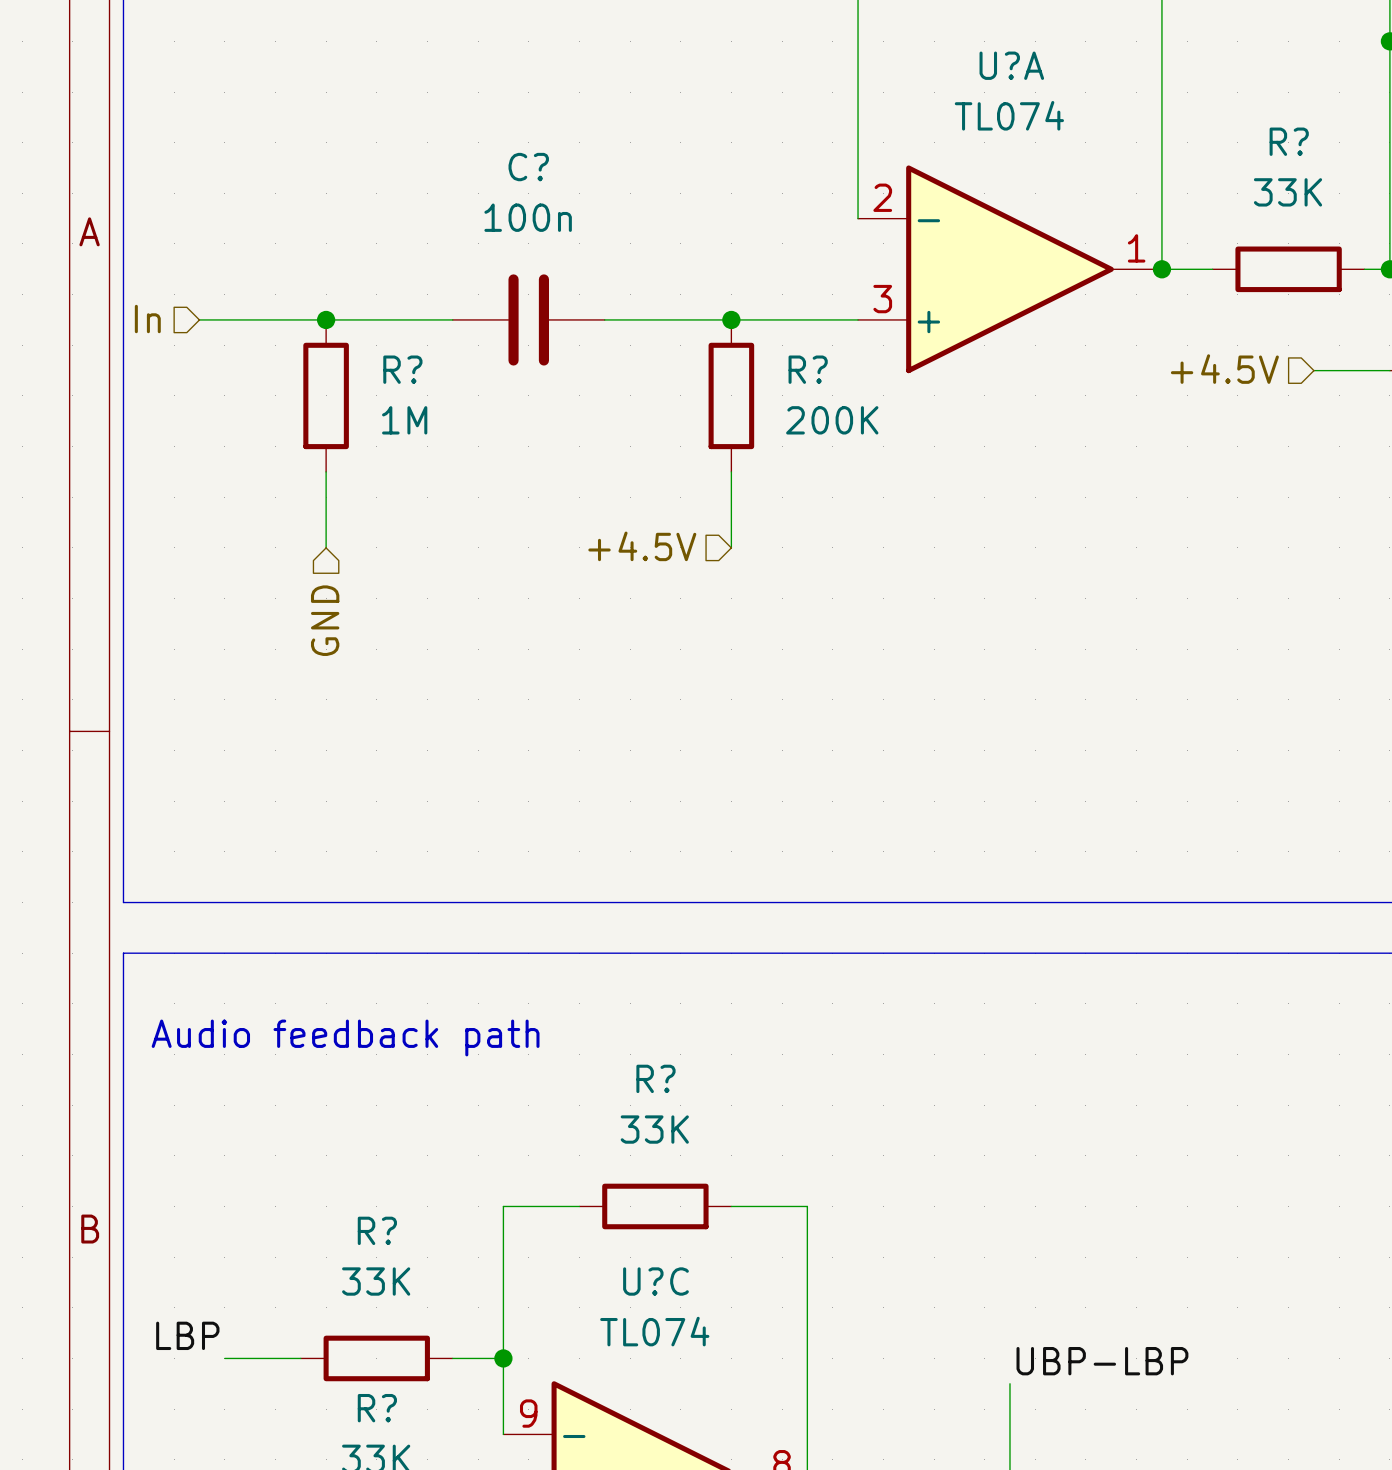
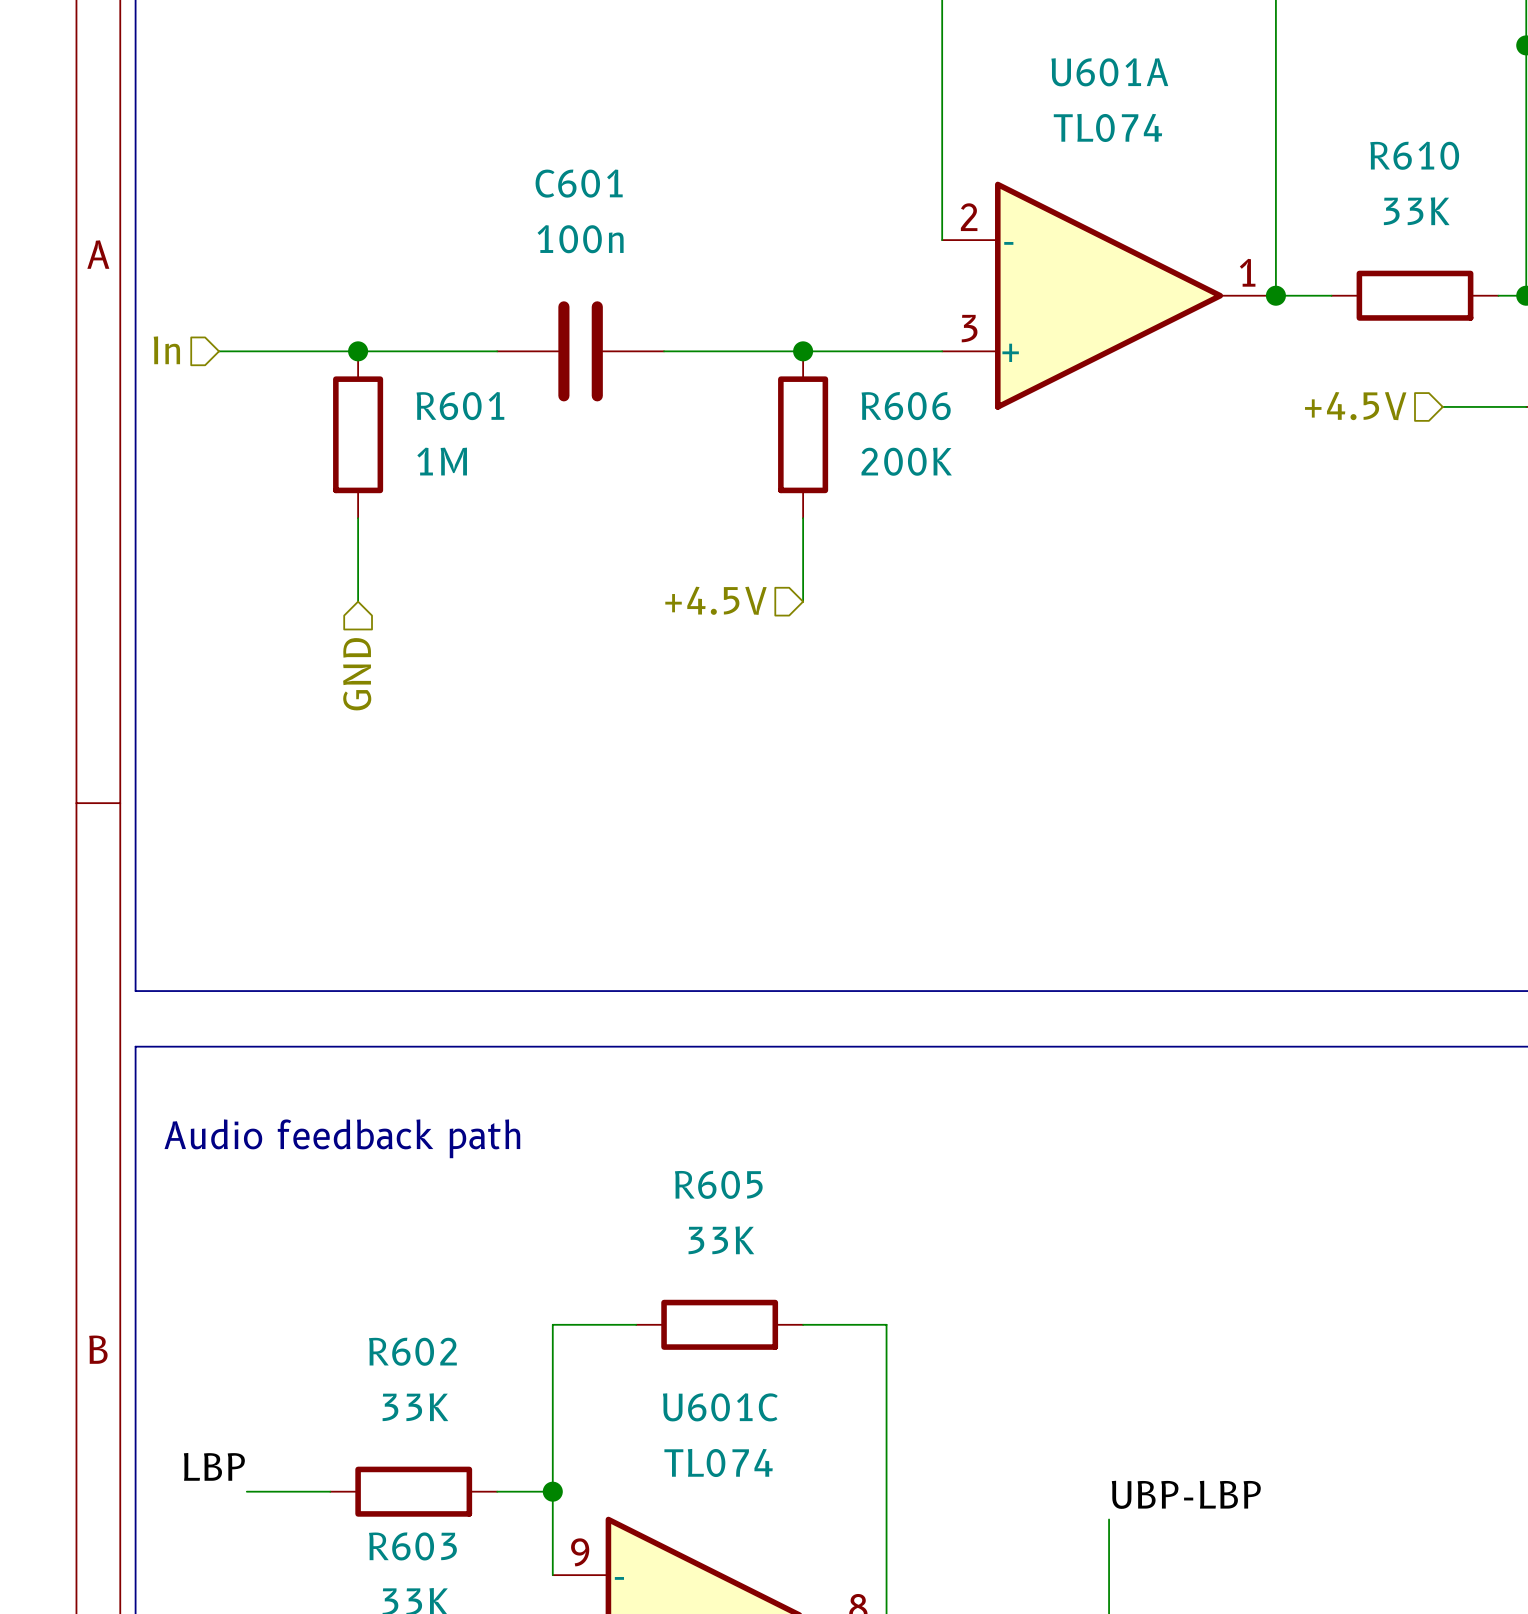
U?A name: U?A (1011, 65) -> U601A (1109, 72)
R? name: R? (1289, 141) -> R610 (1414, 155)
C? name: C? (528, 167) -> C601 (579, 183)
R? name: R? (402, 369) -> R601 (460, 406)
R? name: R? (808, 369) -> R606 (906, 406)
R? name: R? (655, 1078) -> R605 (718, 1184)
R? name: R? (377, 1230) -> R602 (412, 1351)
U?C name: U?C (655, 1281) -> U601C (720, 1407)
R? name: R? (377, 1408) -> R603 (412, 1546)

